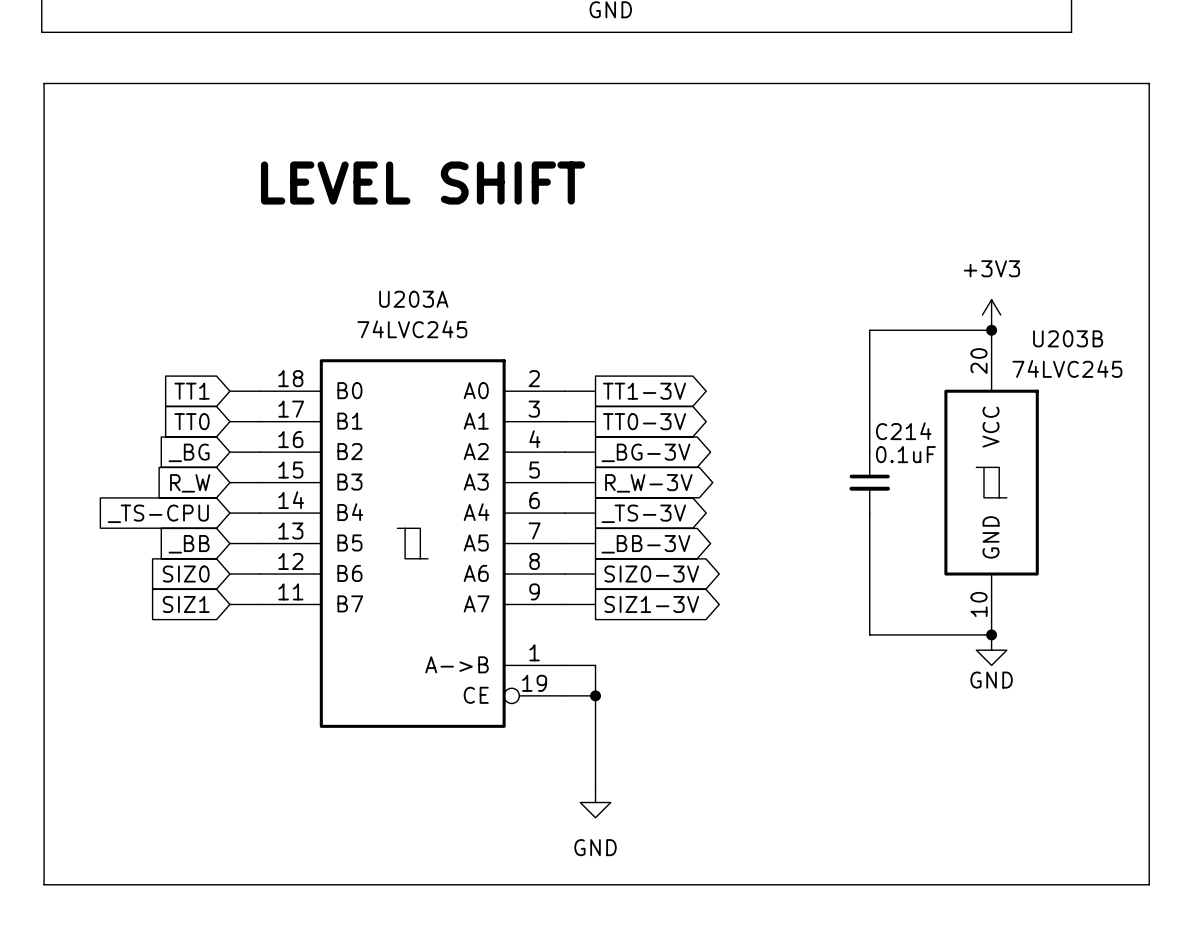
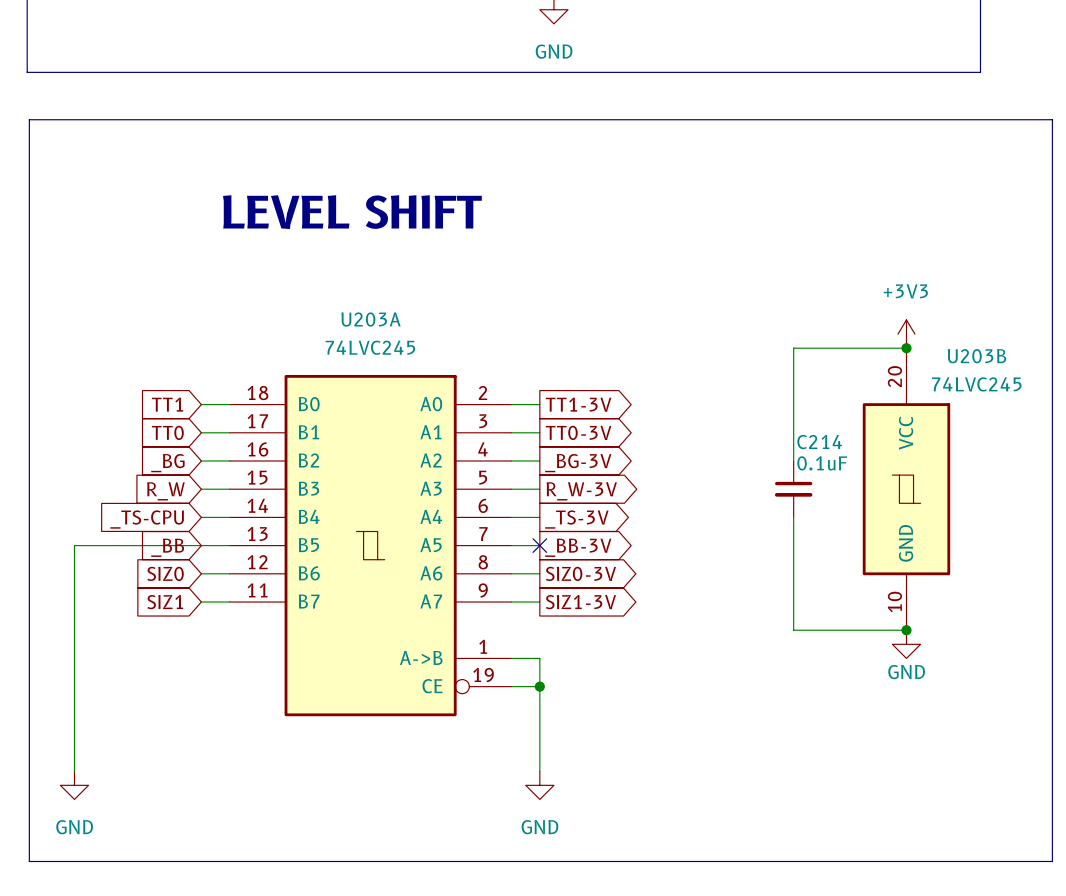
wire: none -> (201, 545) (74, 545) (74, 771)
no-connect mark: none -> (539, 545)
power symbol: none -> GND (74, 785)

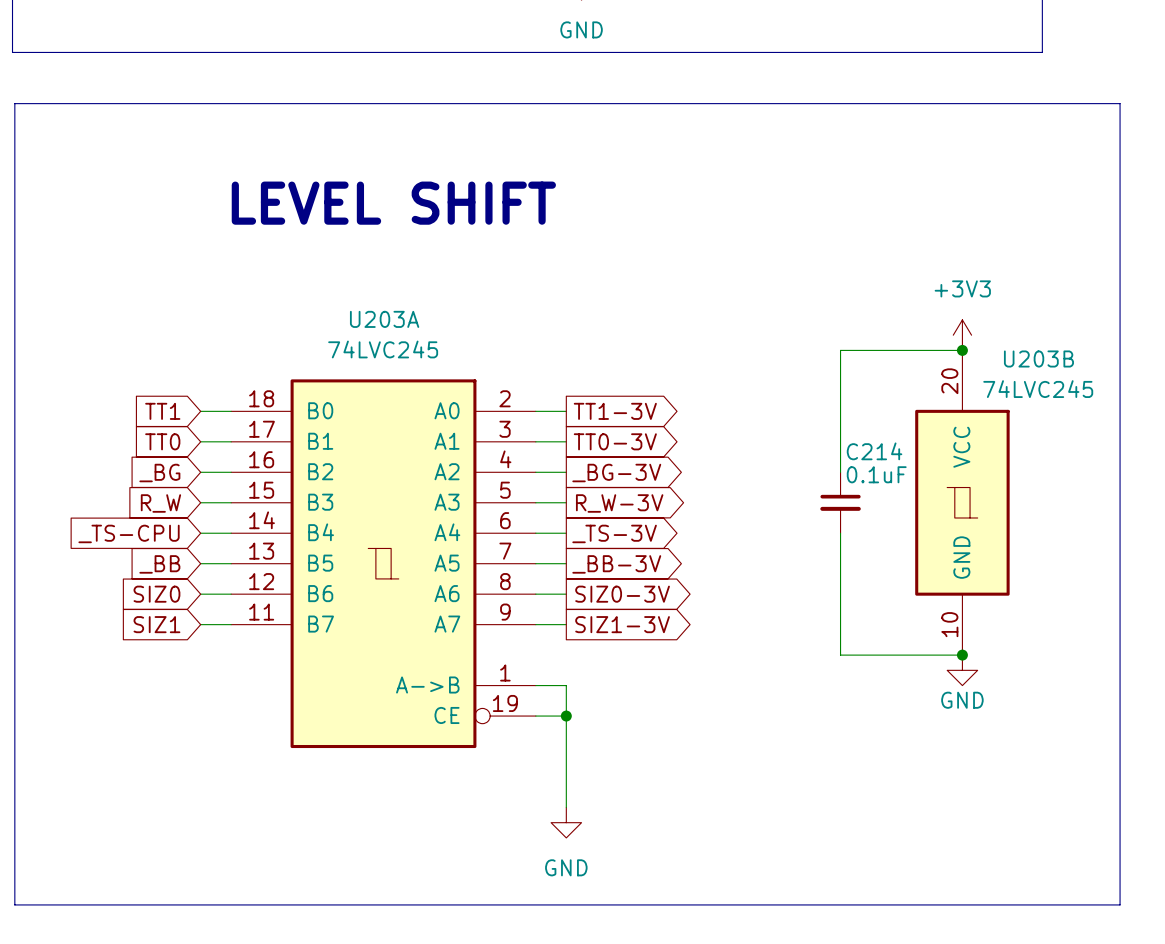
wire: (201, 545) (74, 545) (74, 771) -> none
no-connect mark: (539, 545) -> none
power symbol: GND (74, 785) -> none

